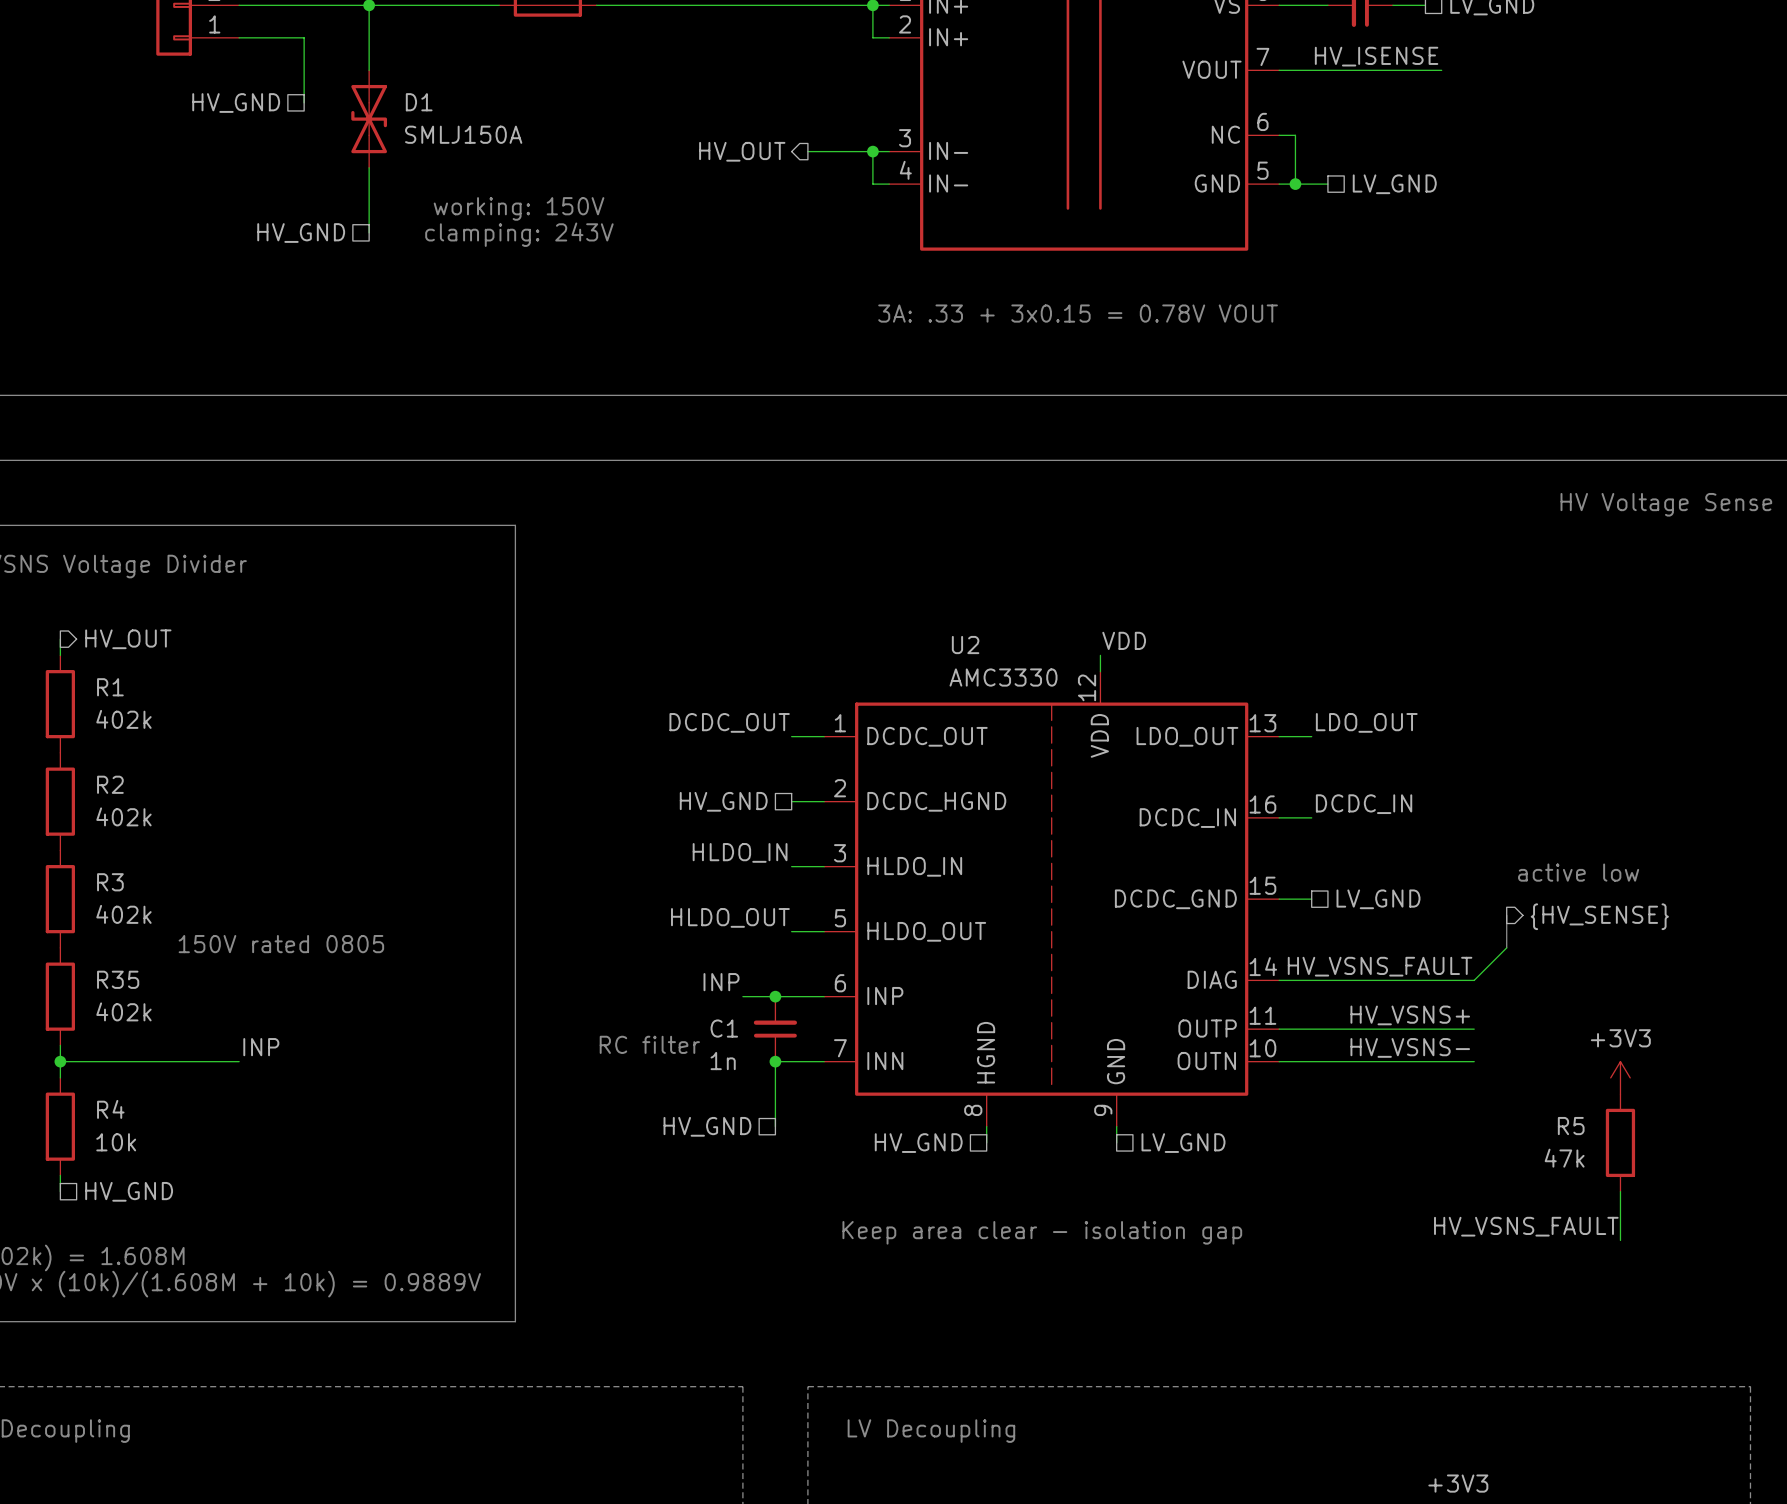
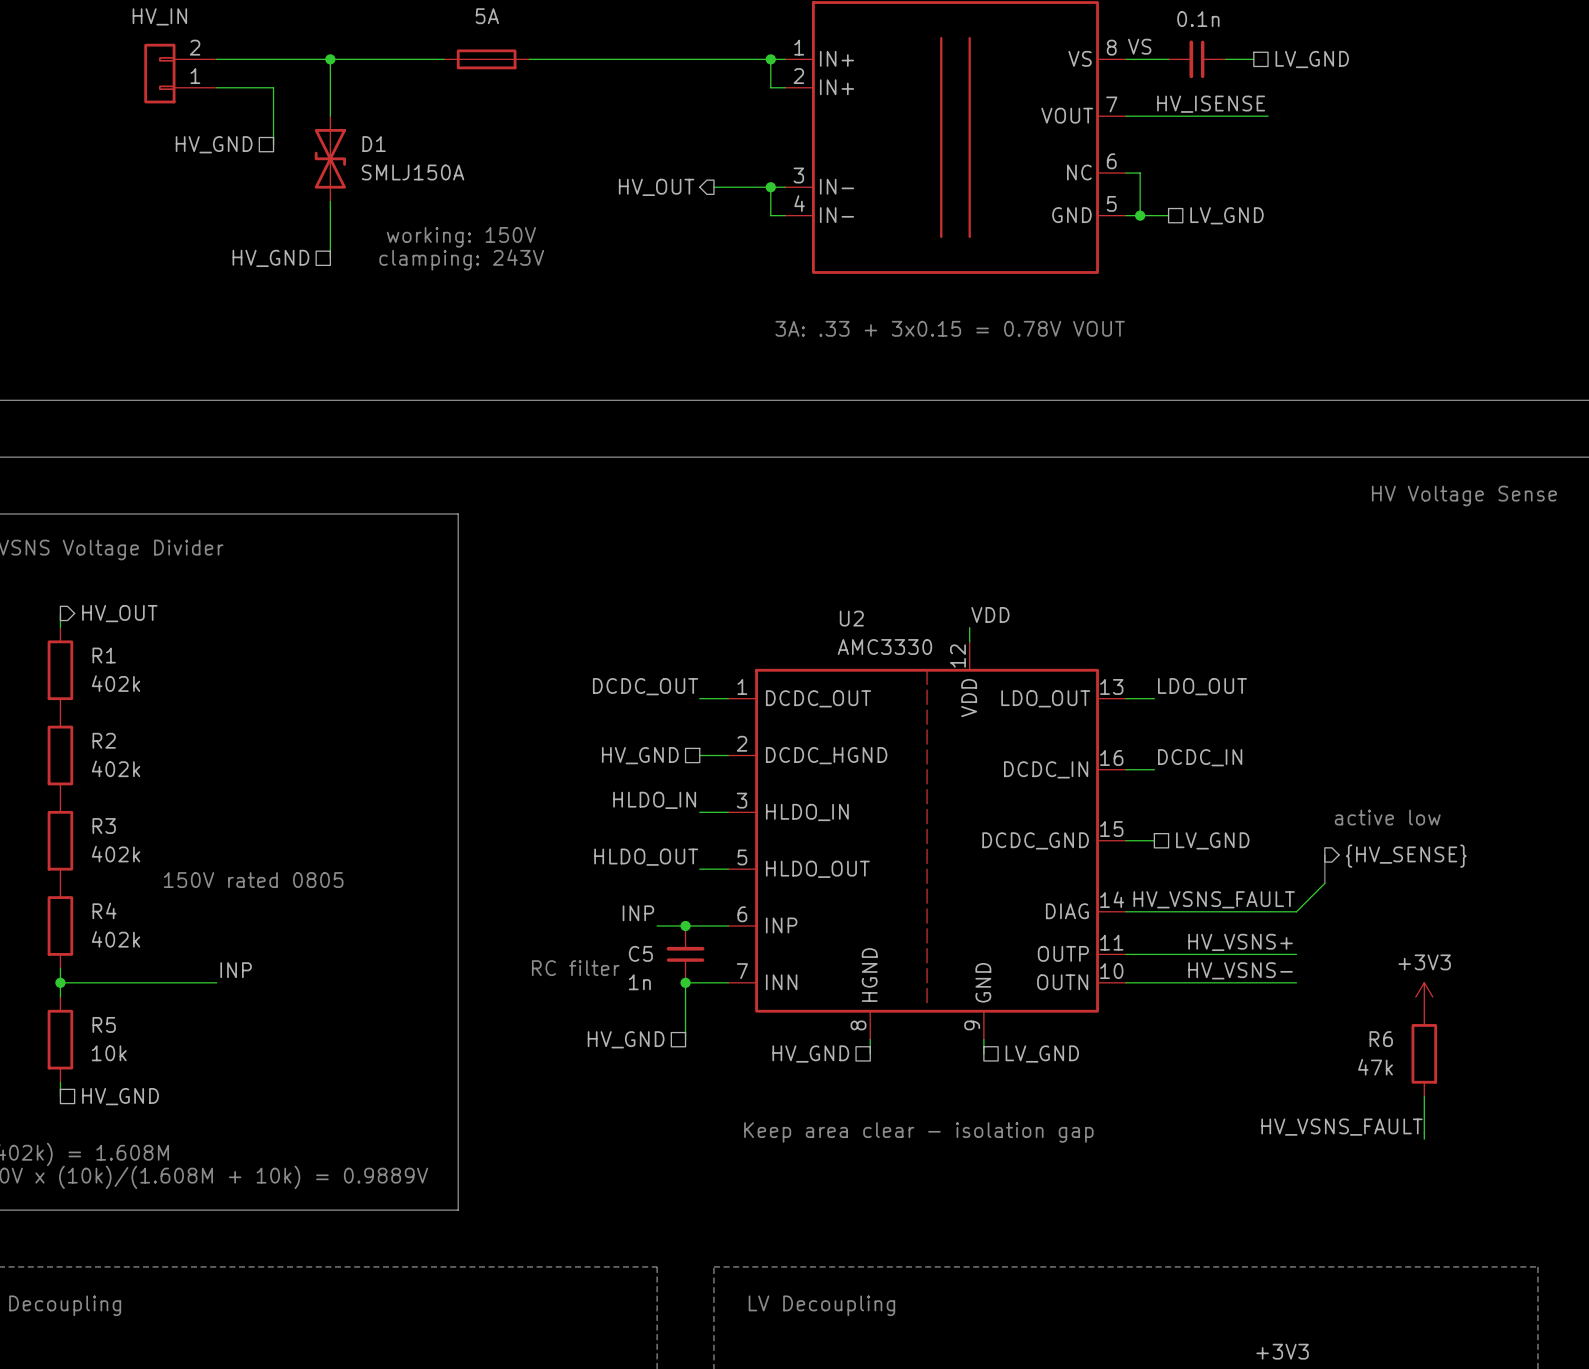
R35 name: R35 (118, 979) -> R4 (104, 910)
C1 name: C1 (724, 1028) -> C5 (640, 953)
R4 name: R4 (110, 1109) -> R5 (104, 1024)
R5 name: R5 (1571, 1126) -> R6 (1381, 1039)

